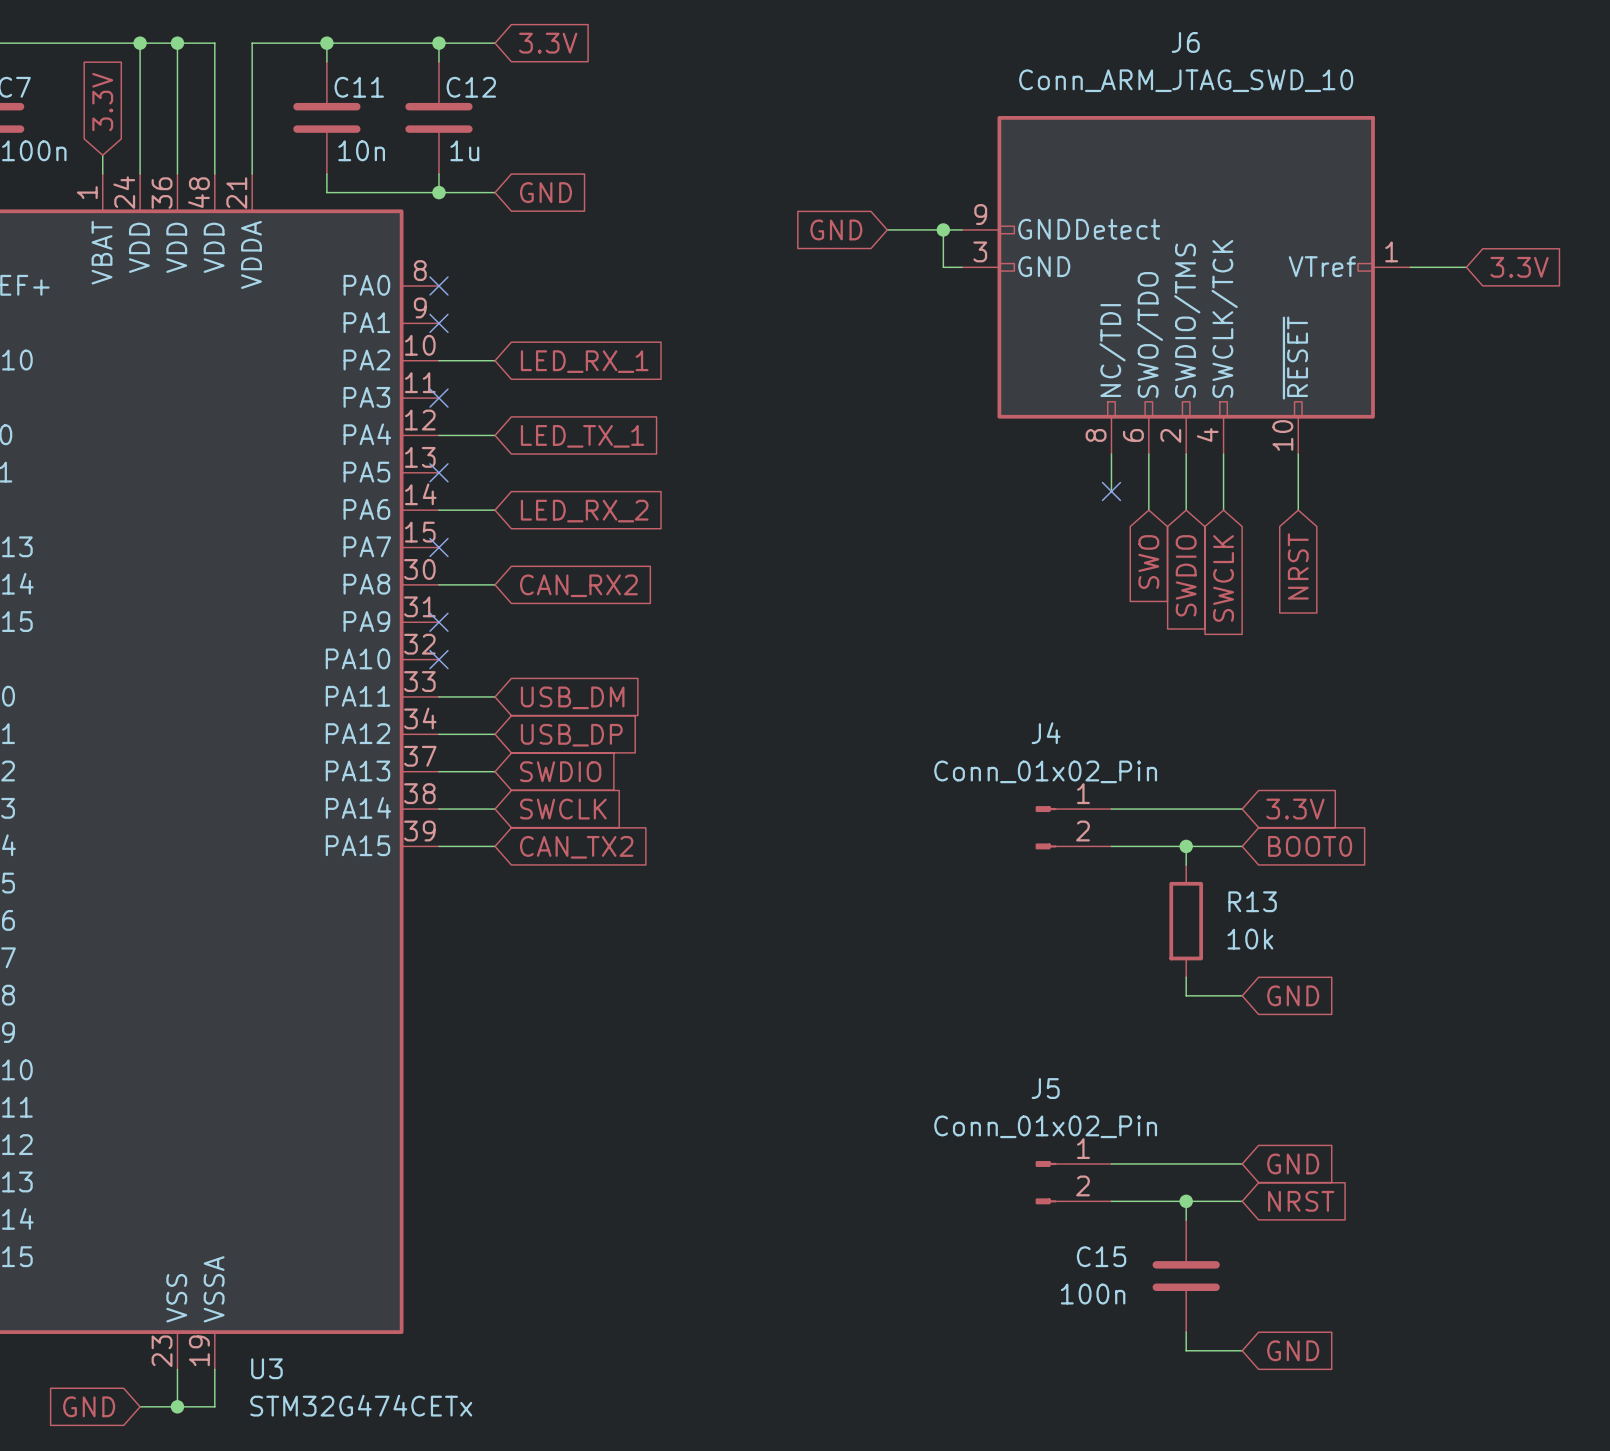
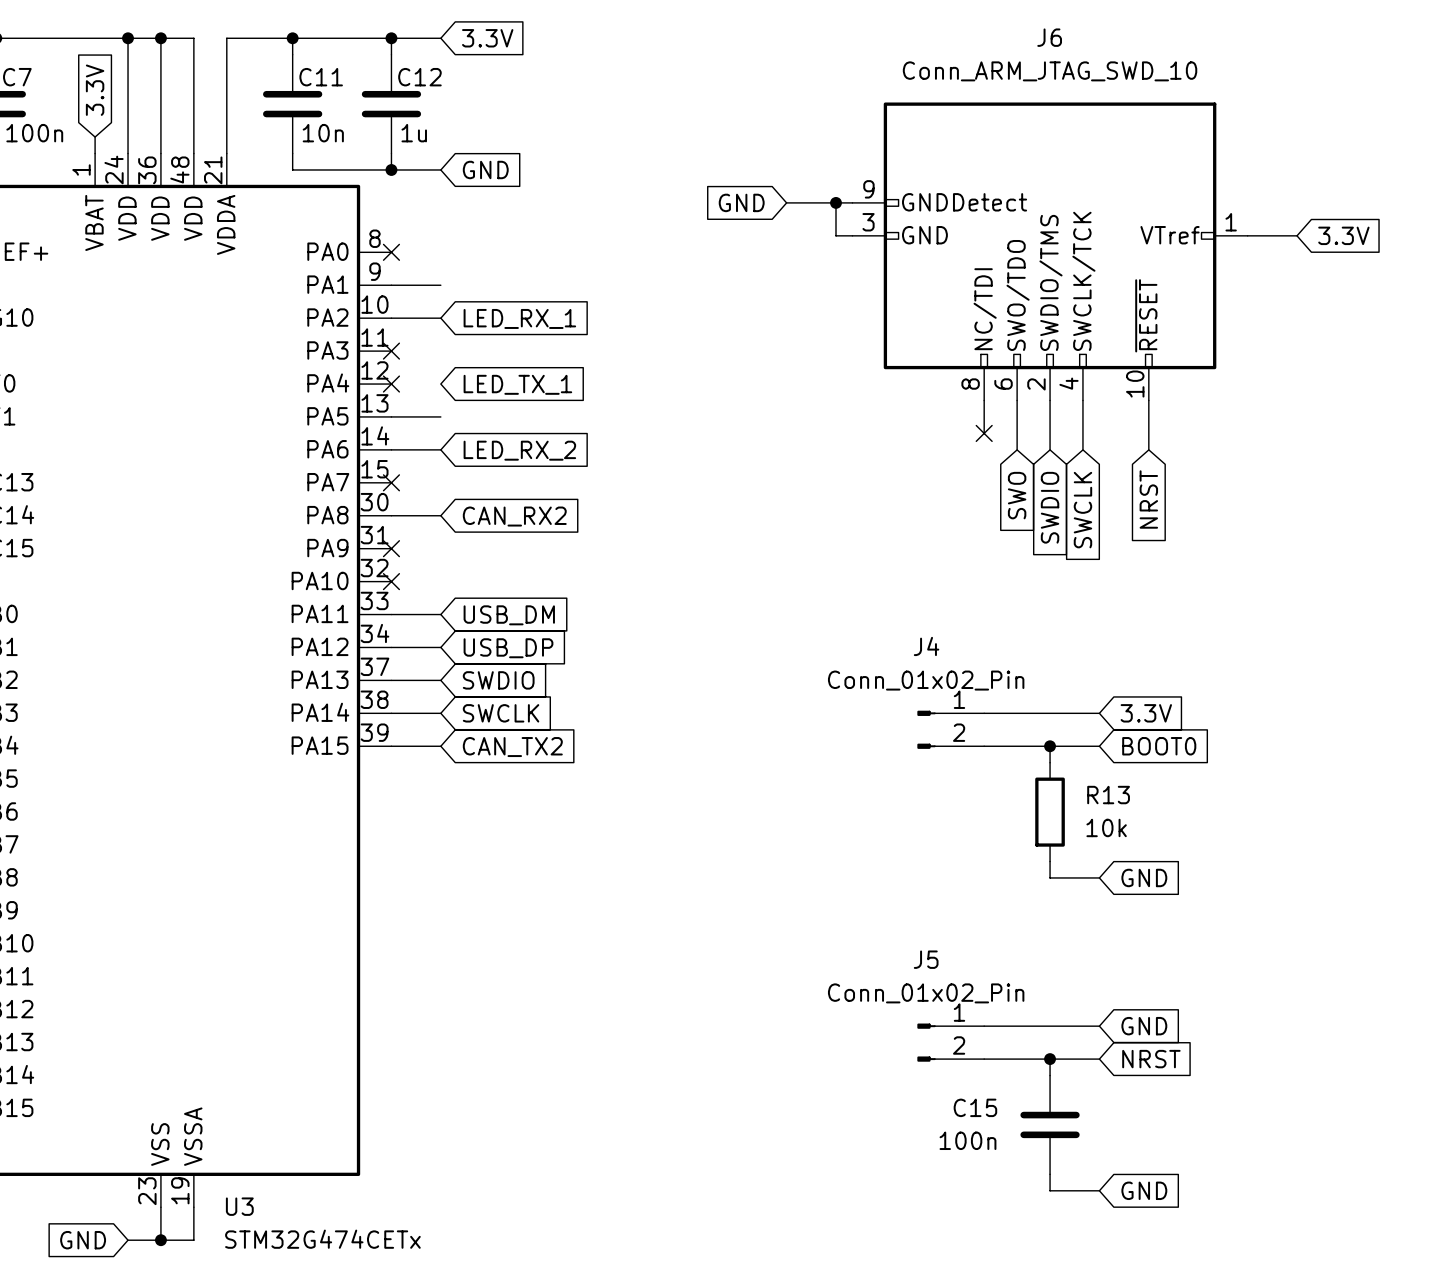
wire: none -> (391, 285) (440, 285)
no-connect mark: (438, 323) -> none
wire: (438, 435) (495, 435) -> (391, 416) (440, 416)
no-connect mark position: (438, 472) -> (391, 384)

